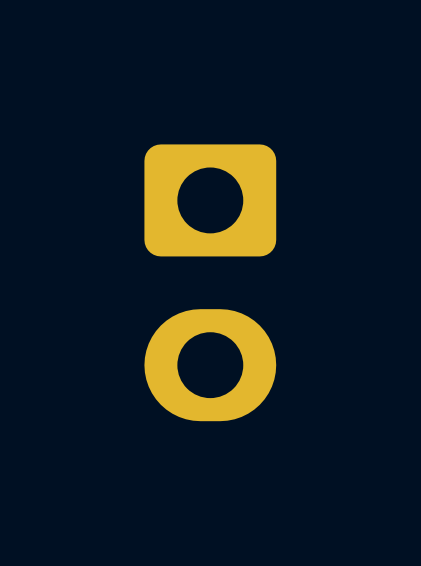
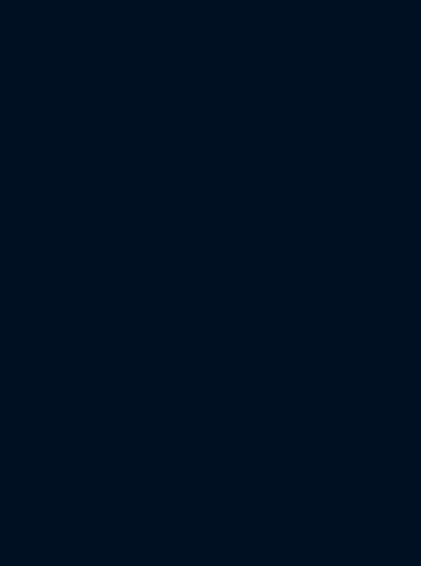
part: (210, 282) -> none

